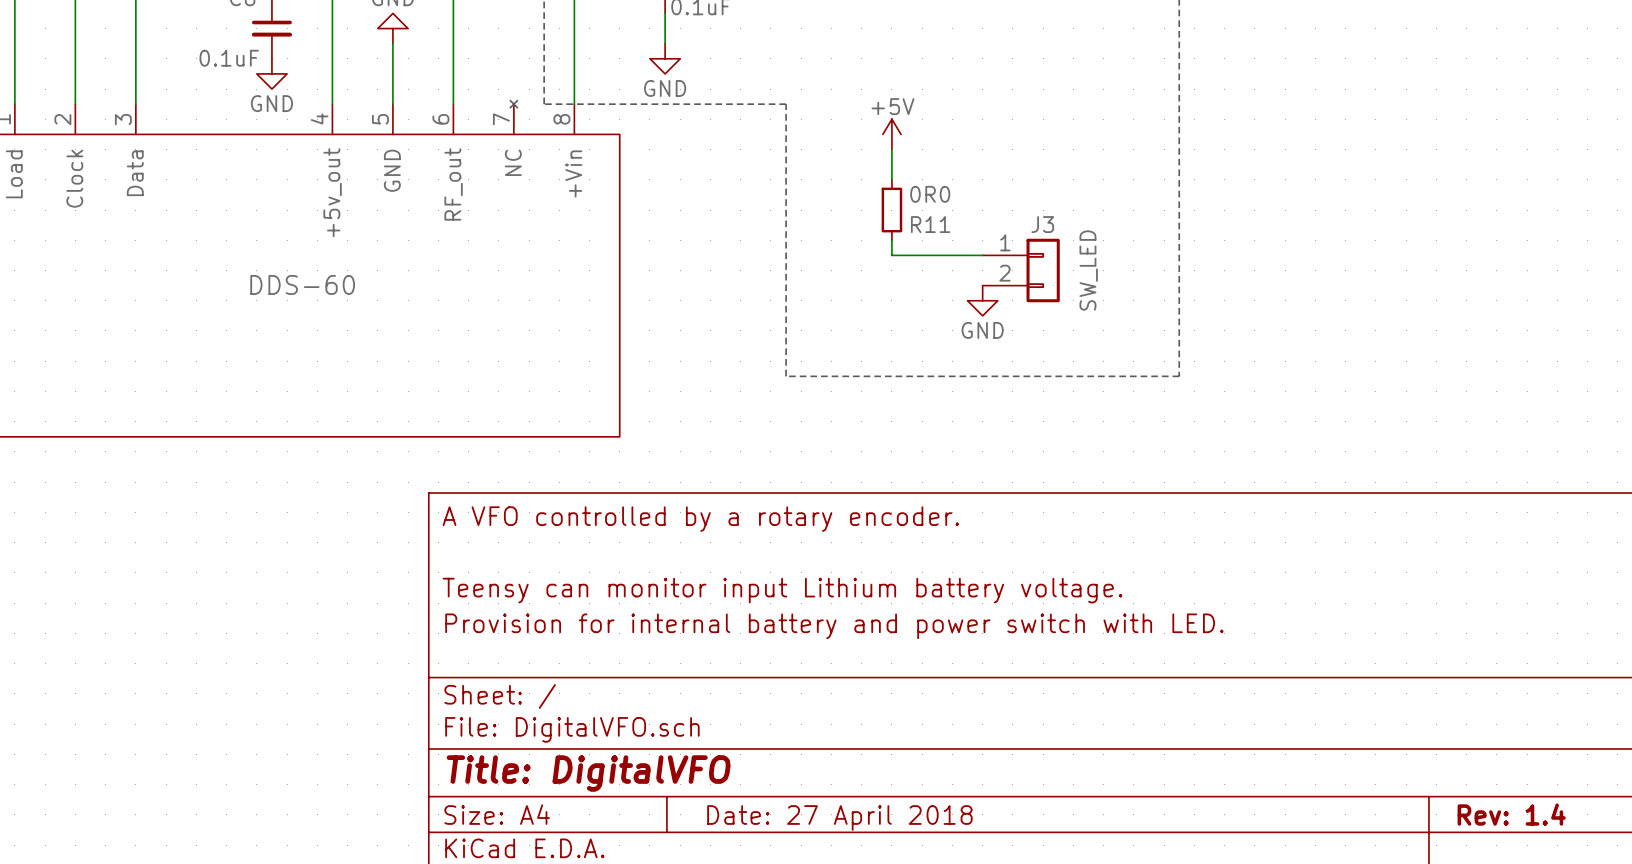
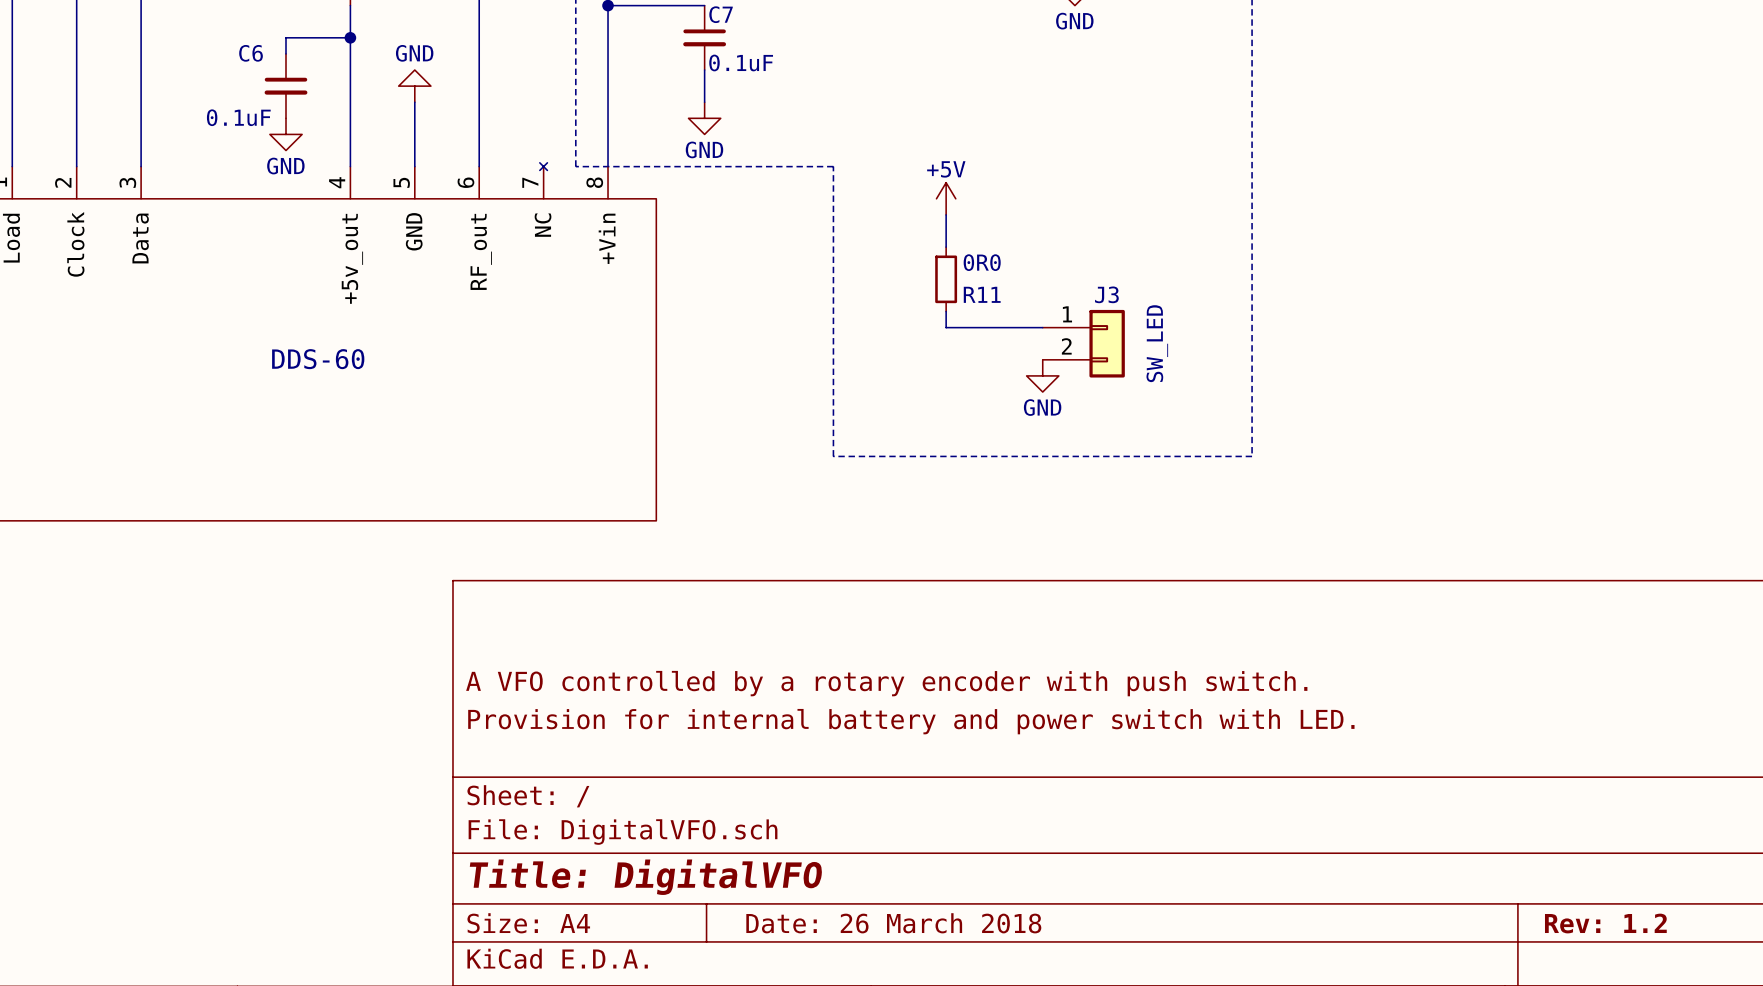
title block: A VFO controlled by a rotary encoder. (700, 519) -> none
title block: Teensy can monitor input Lithium battery voltage. (782, 590) -> A VFO controlled by a rotary encoder with push switch. (886, 683)
title block: Rev: 1.4 (1511, 814) -> Rev: 1.2 (1605, 923)
title block: Date: 27 April 2018 (839, 817) -> Date: 26 March 2018 (893, 923)

